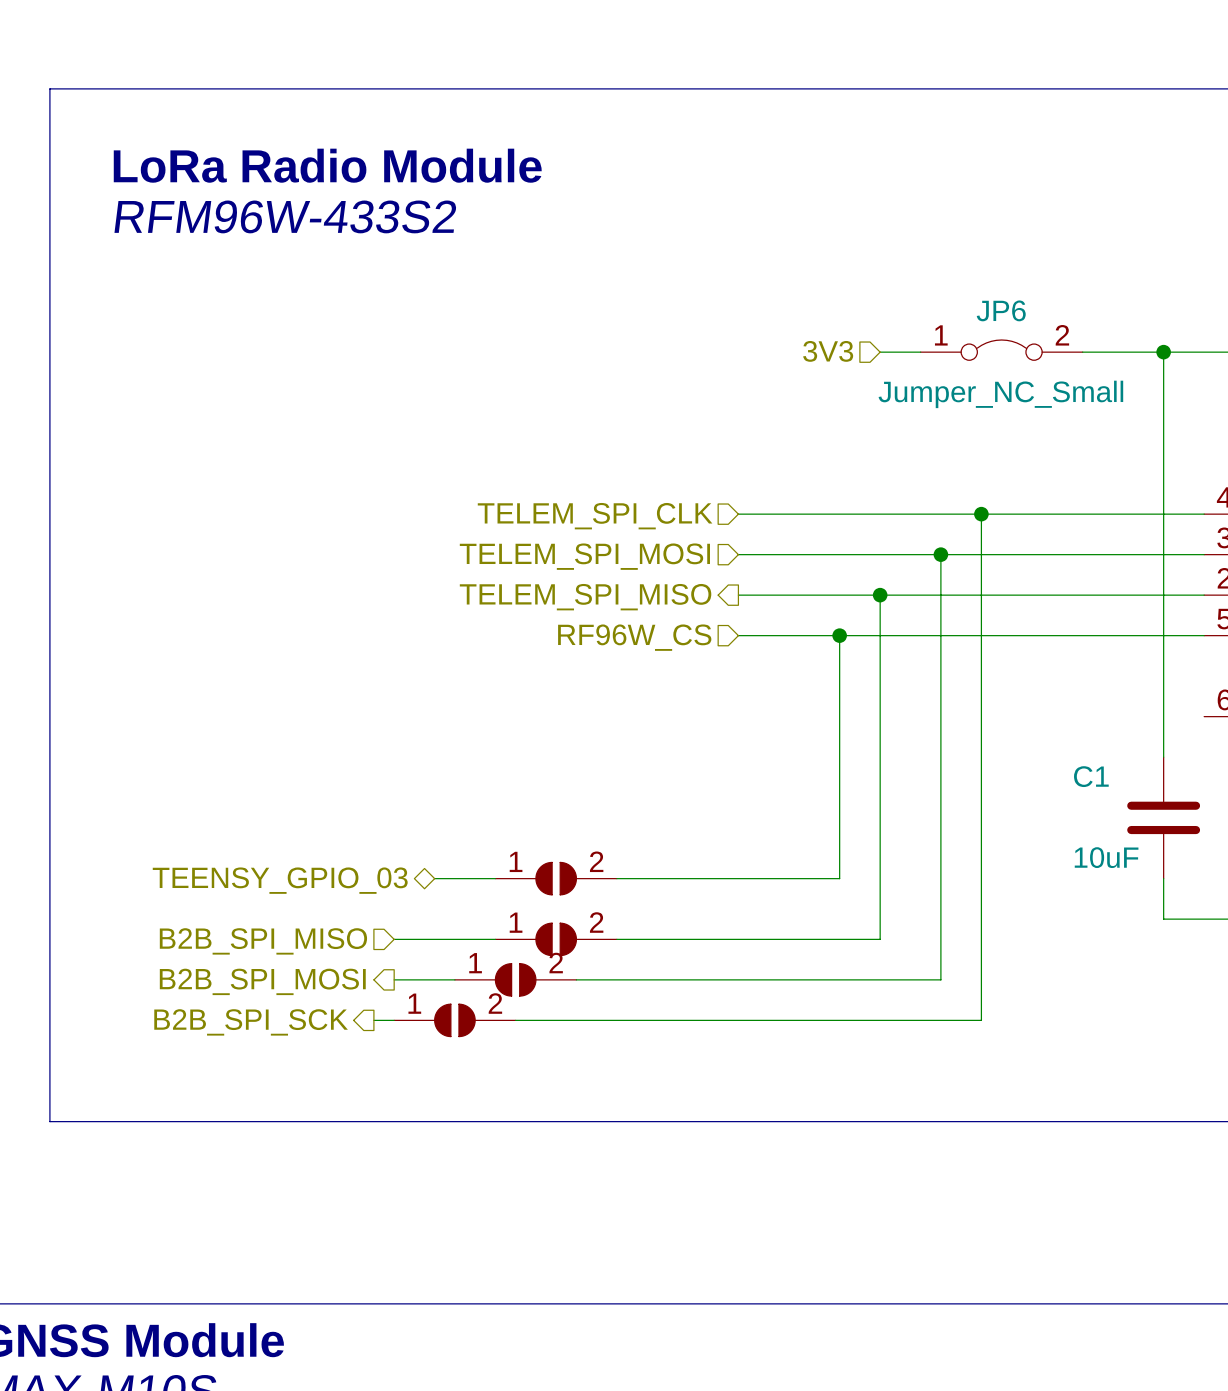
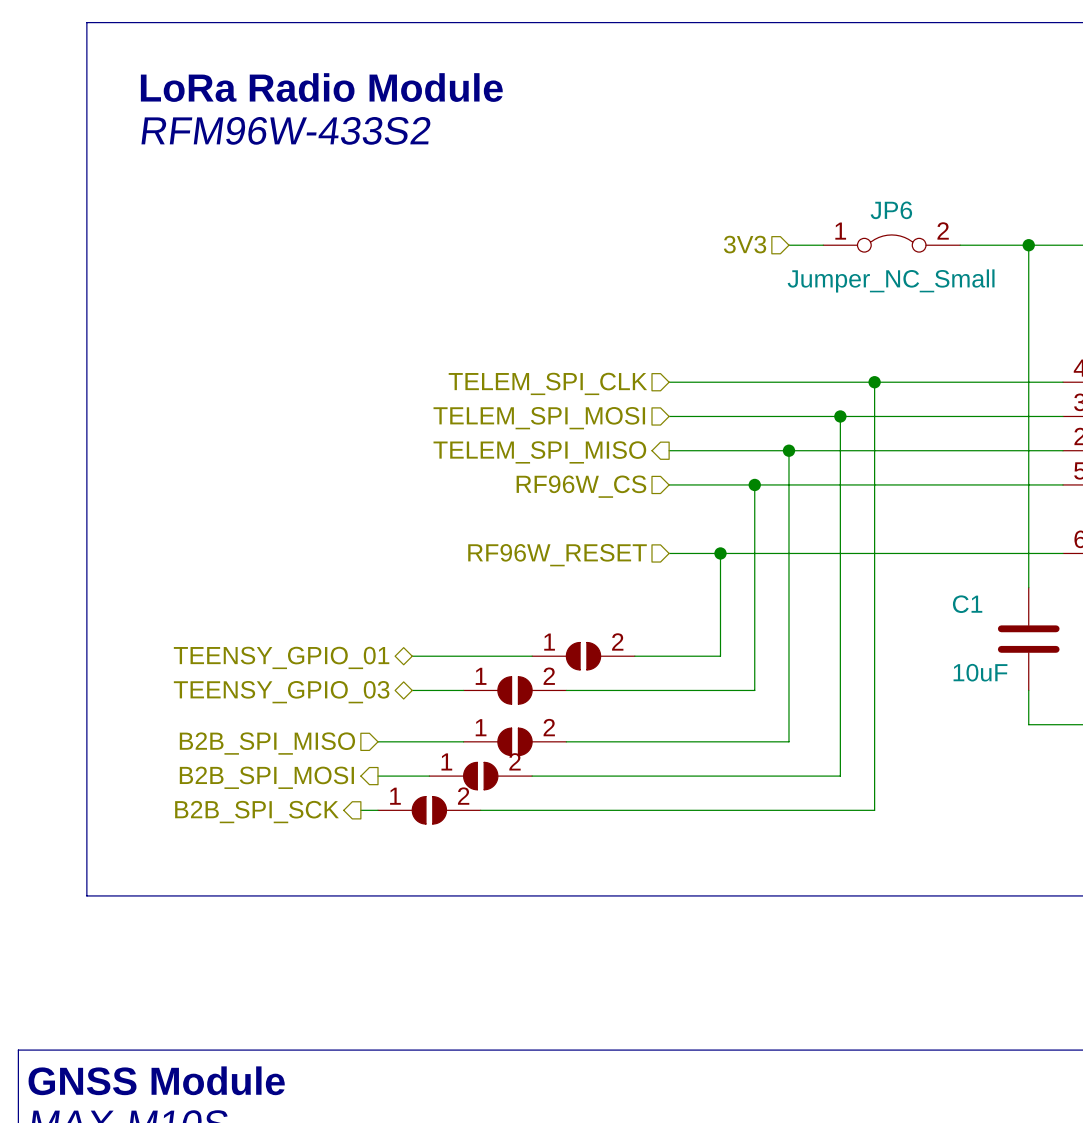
wire: none -> (669, 553) (1062, 553)
wire: none -> (720, 553) (720, 656) (634, 656)
junction: none -> (720, 553)
hierarchical label: none -> RF96W_RESET (557, 555)
wire: none -> (412, 656) (532, 656)
part: none -> (583, 656)
hierarchical label: none -> TEENSY_GPIO_01 (281, 657)

